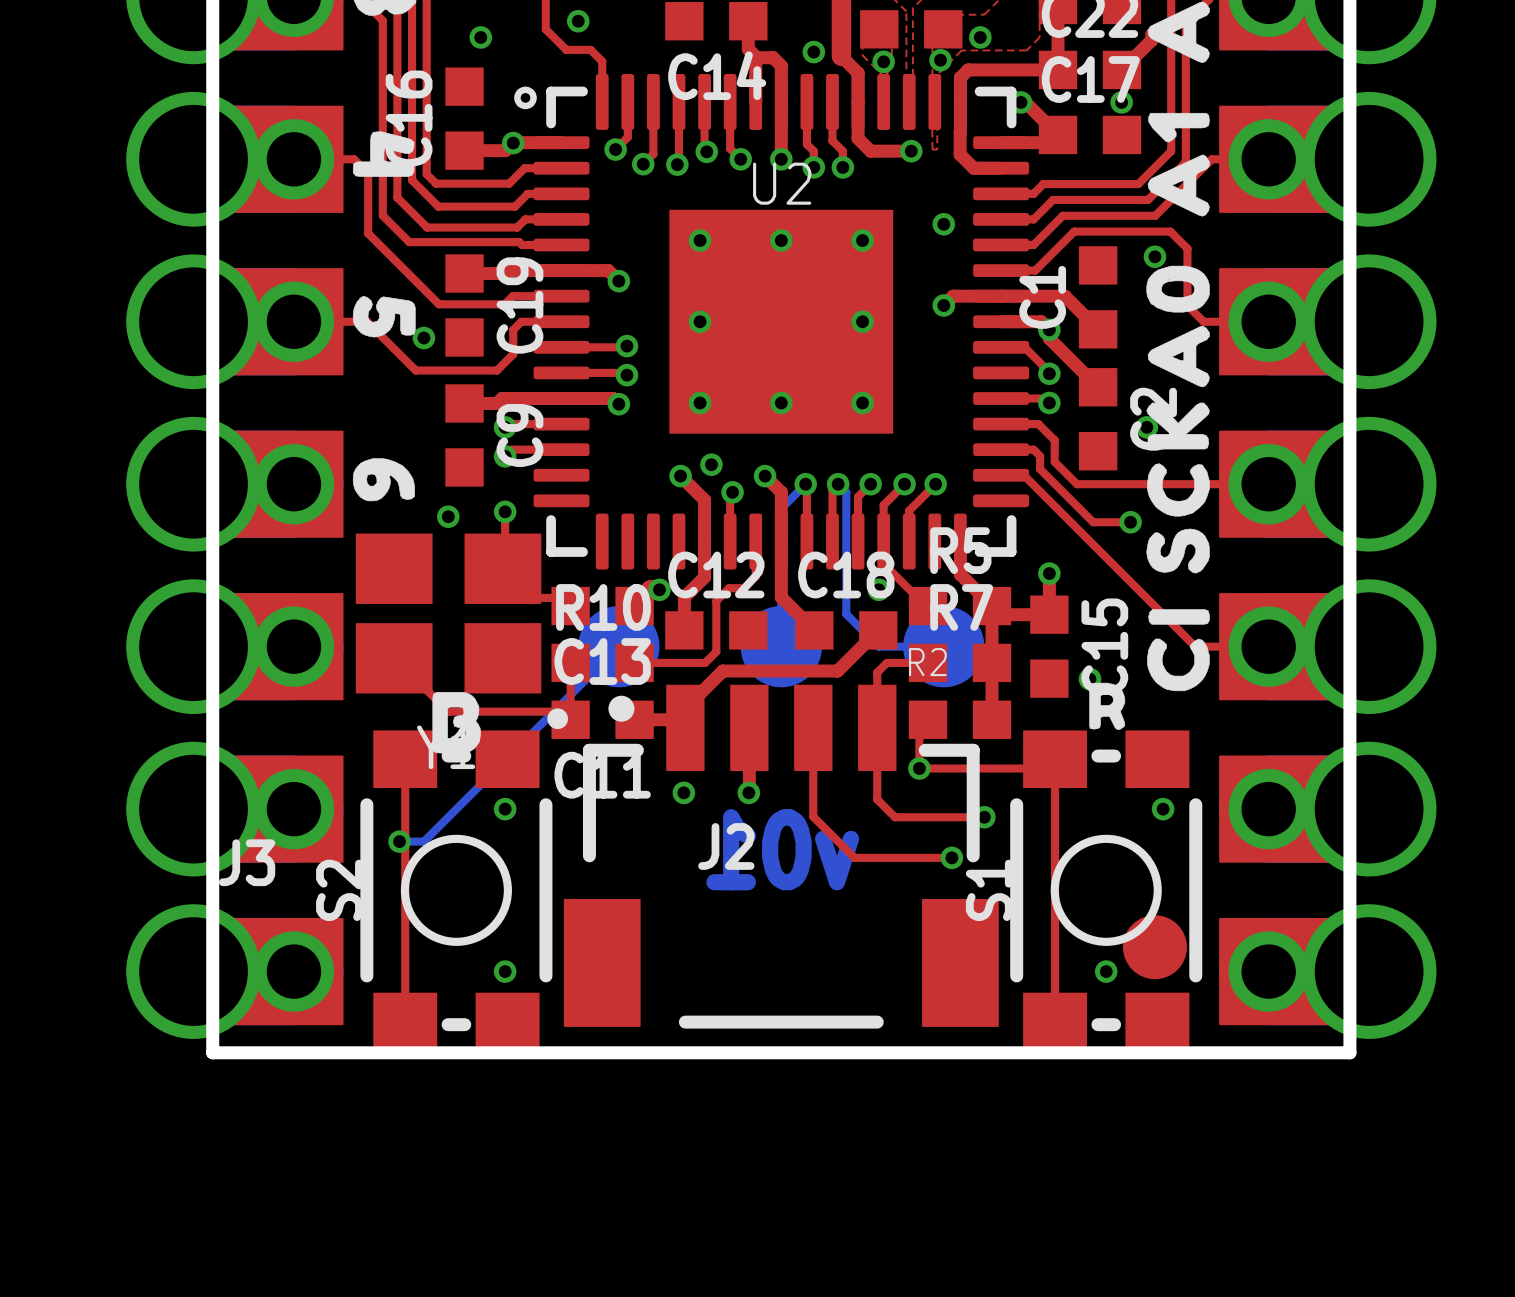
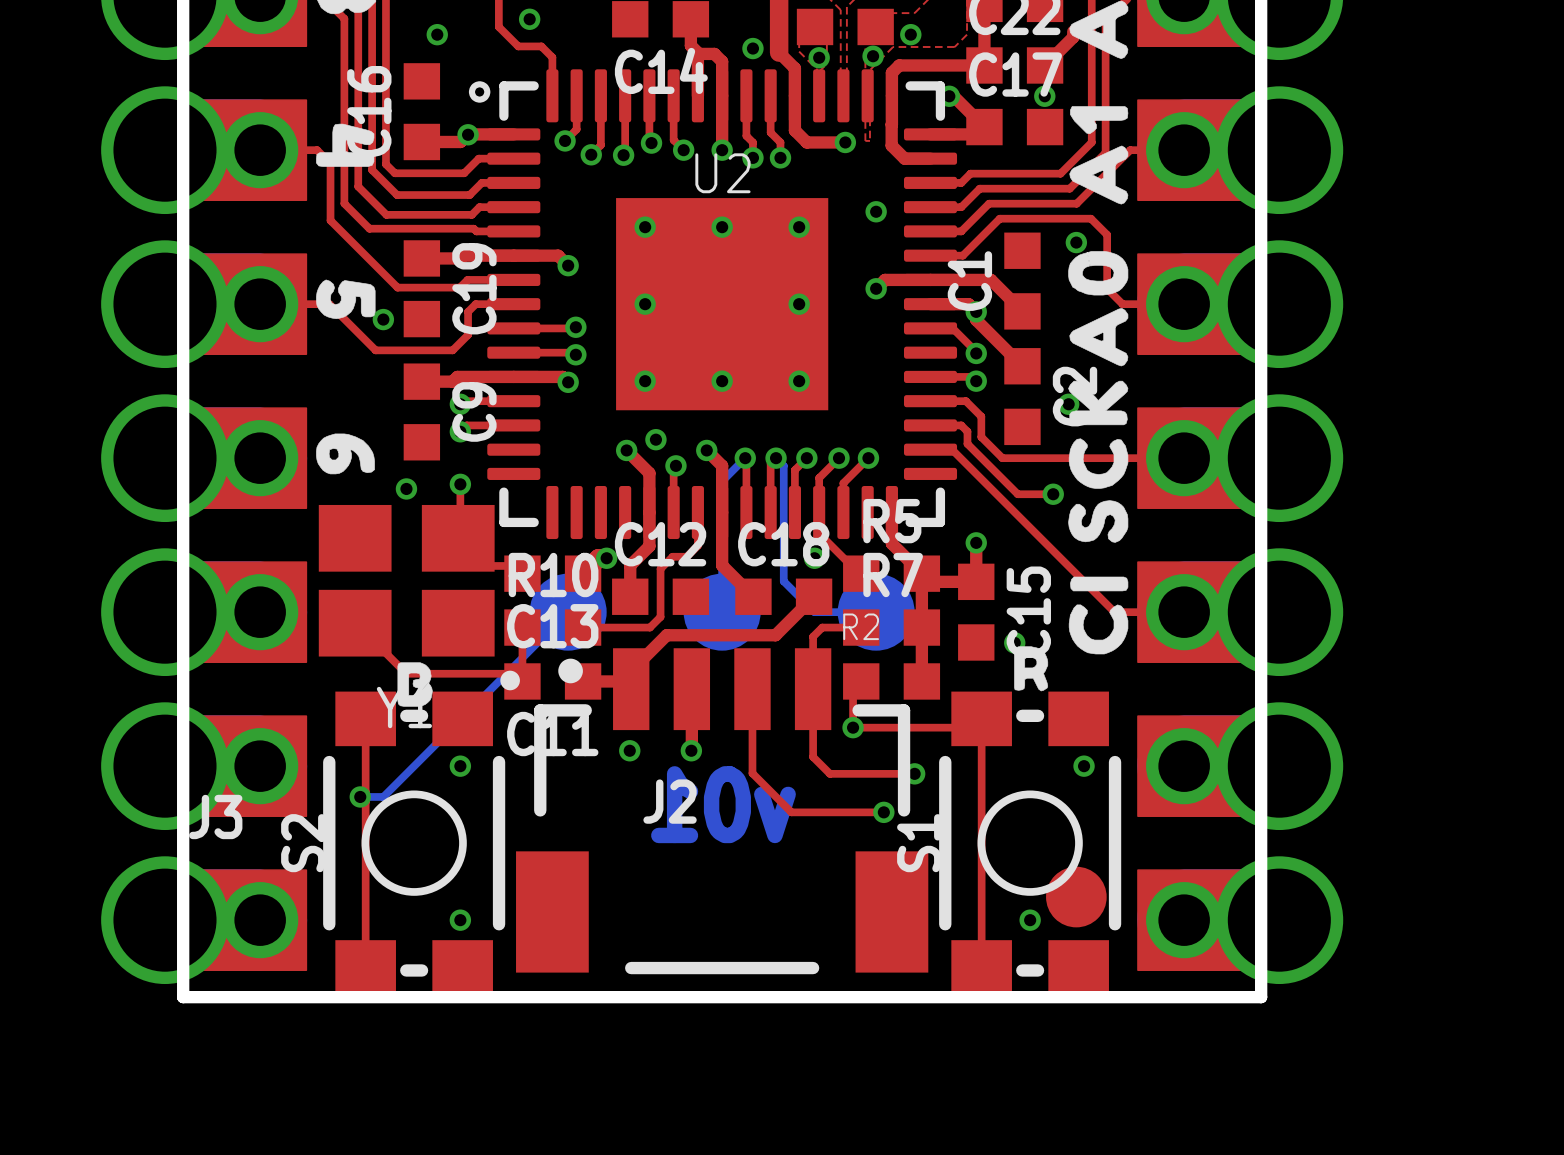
drawing shape: [432, 692, 482, 754] -> [397, 662, 433, 707]

